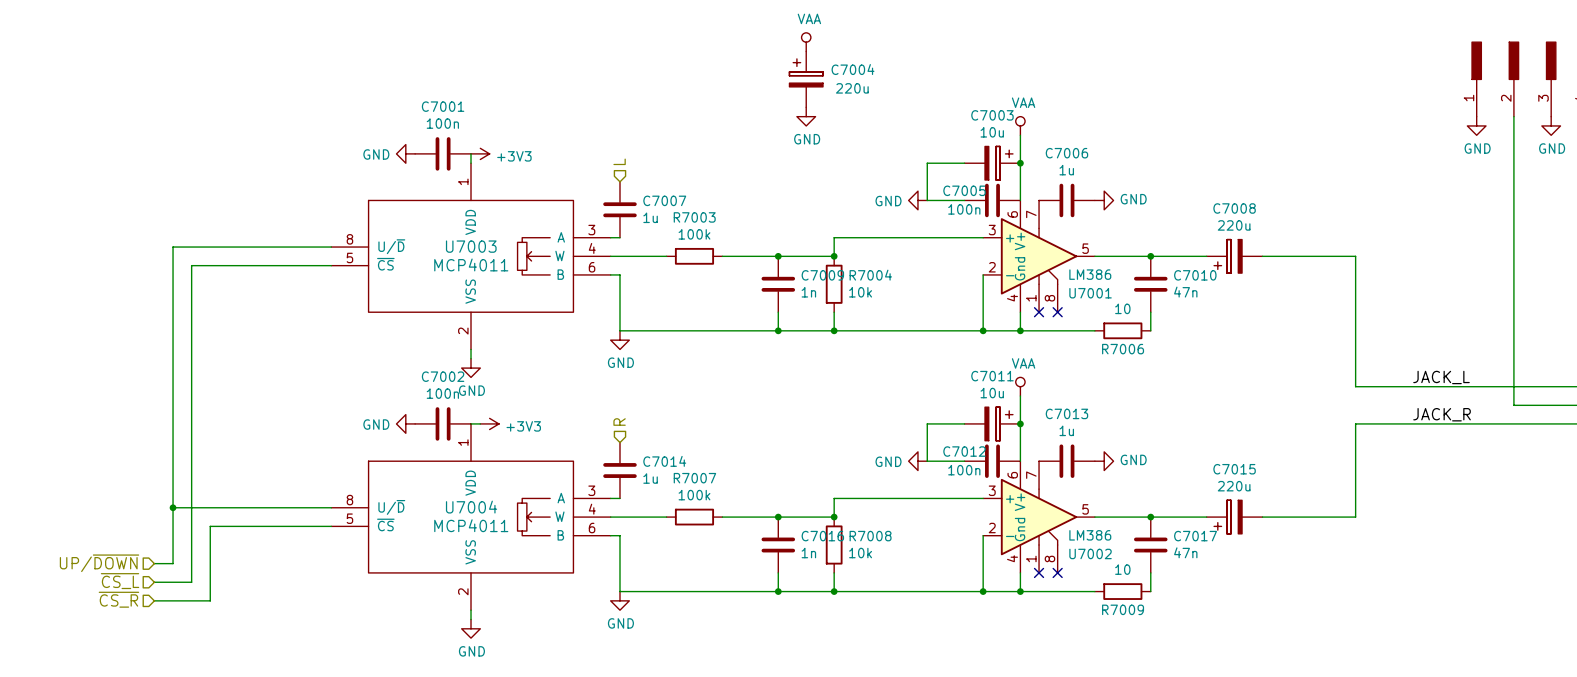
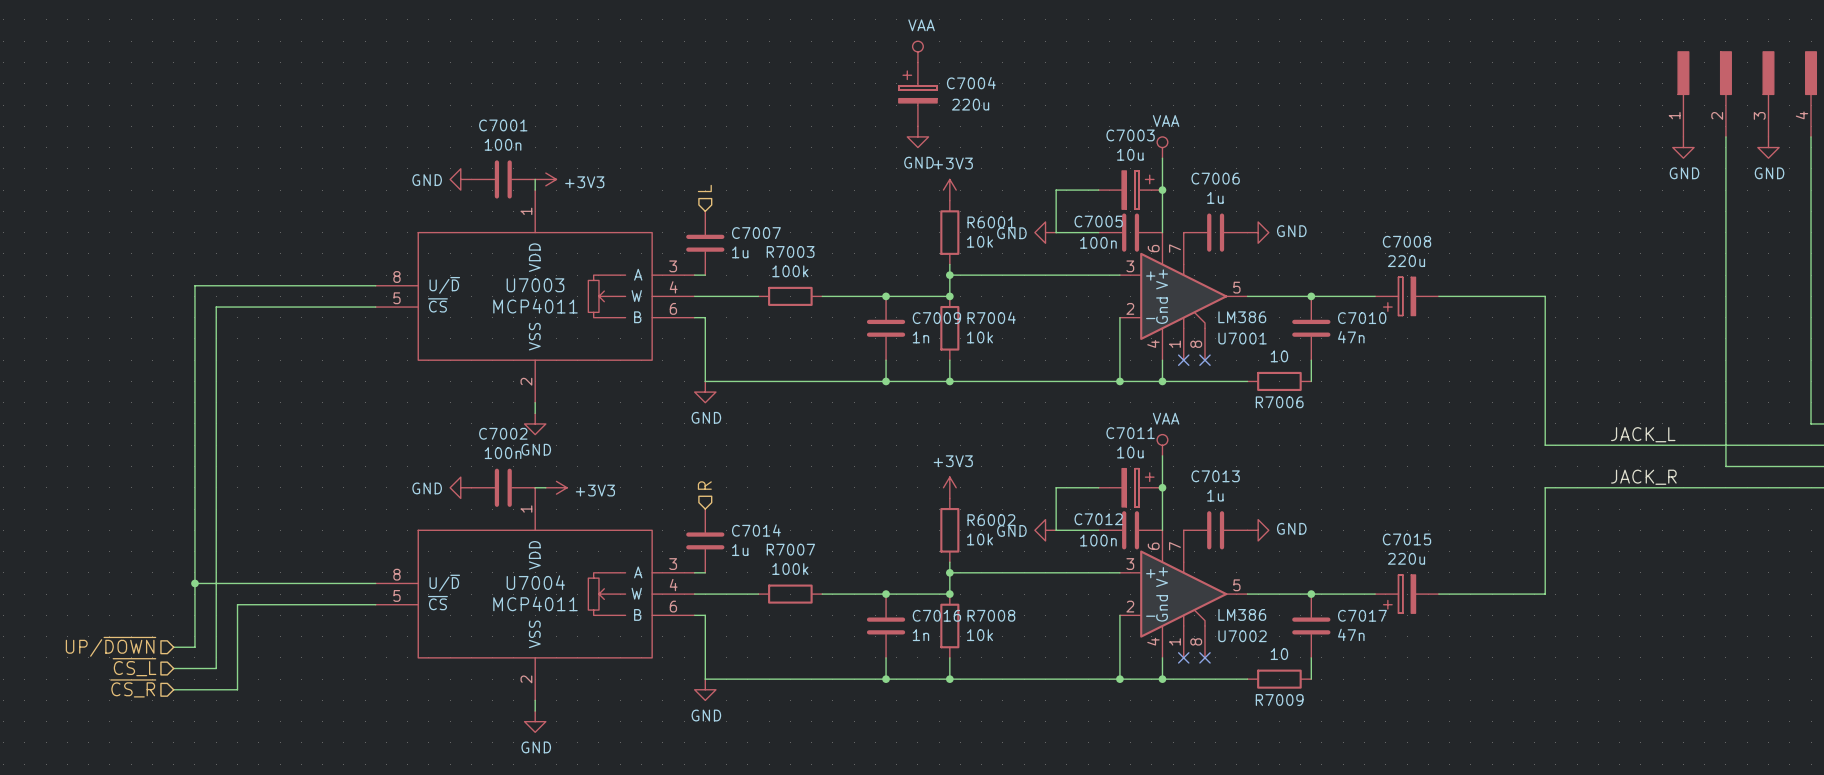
power symbol: none -> +3V3 (949, 190)
R6001: none -> 10k (949, 232)
wire: none -> (949, 264) (949, 275)
junction: none -> (949, 275)
power symbol: none -> +3V3 (949, 487)
R6002: none -> 10k (949, 530)
wire: none -> (949, 562) (949, 572)
junction: none -> (949, 572)

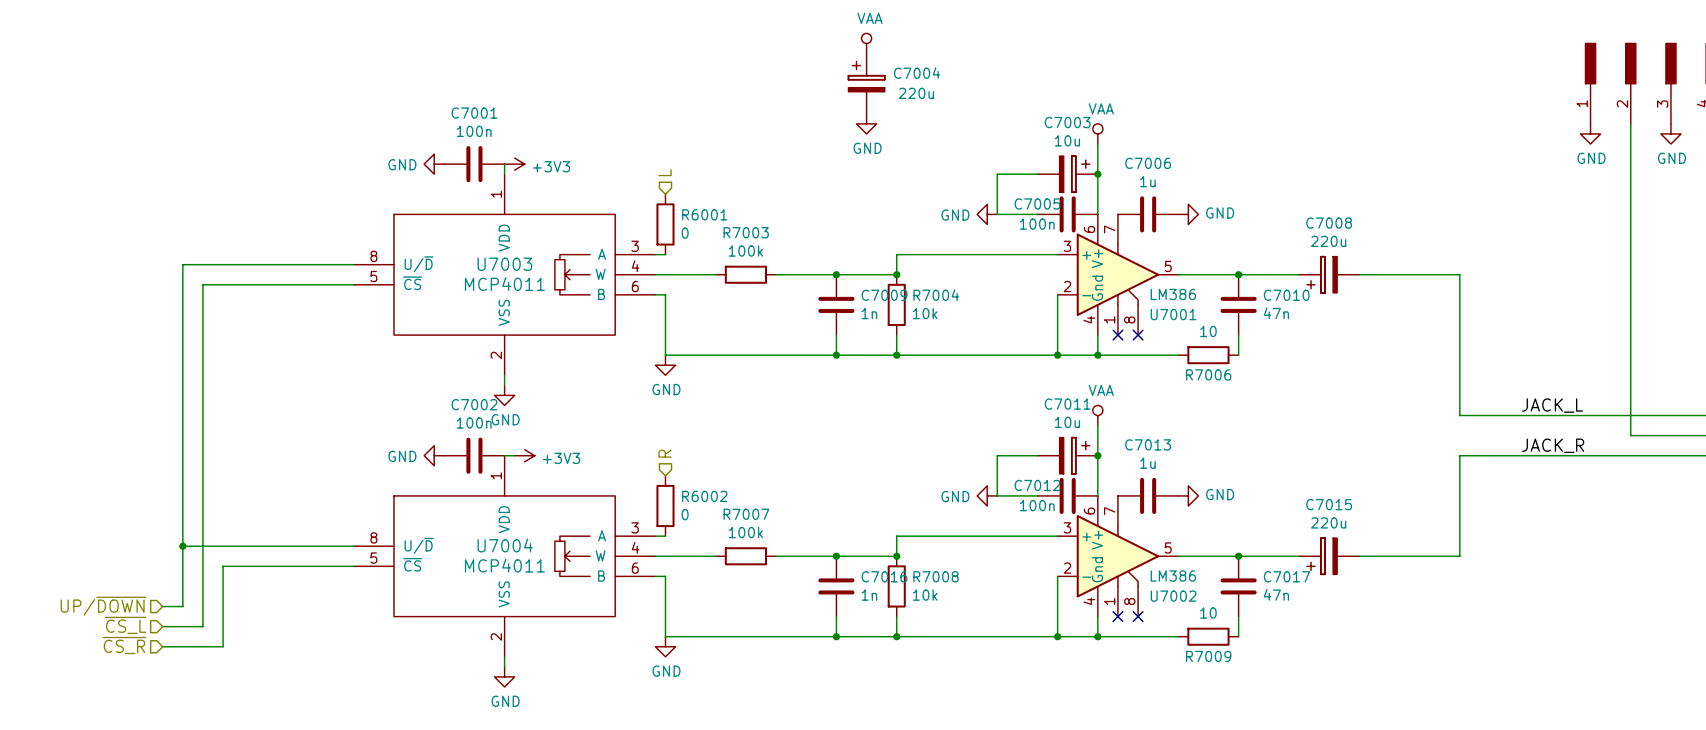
power symbol: +3V3 (949, 190) -> none
R6001 position: (949, 232) -> (665, 224)
R6001 value: 10k (979, 241) -> 0 (685, 233)
C7007: 1u (705, 243) -> none
wire: (949, 264) (949, 275) -> none
junction: (949, 275) -> none
power symbol: +3V3 (949, 487) -> none
R6002 position: (949, 530) -> (665, 506)
R6002 value: 10k (979, 539) -> 0 (685, 514)
C7014: 1u (705, 540) -> none
wire: (949, 562) (949, 572) -> none
junction: (949, 572) -> none

